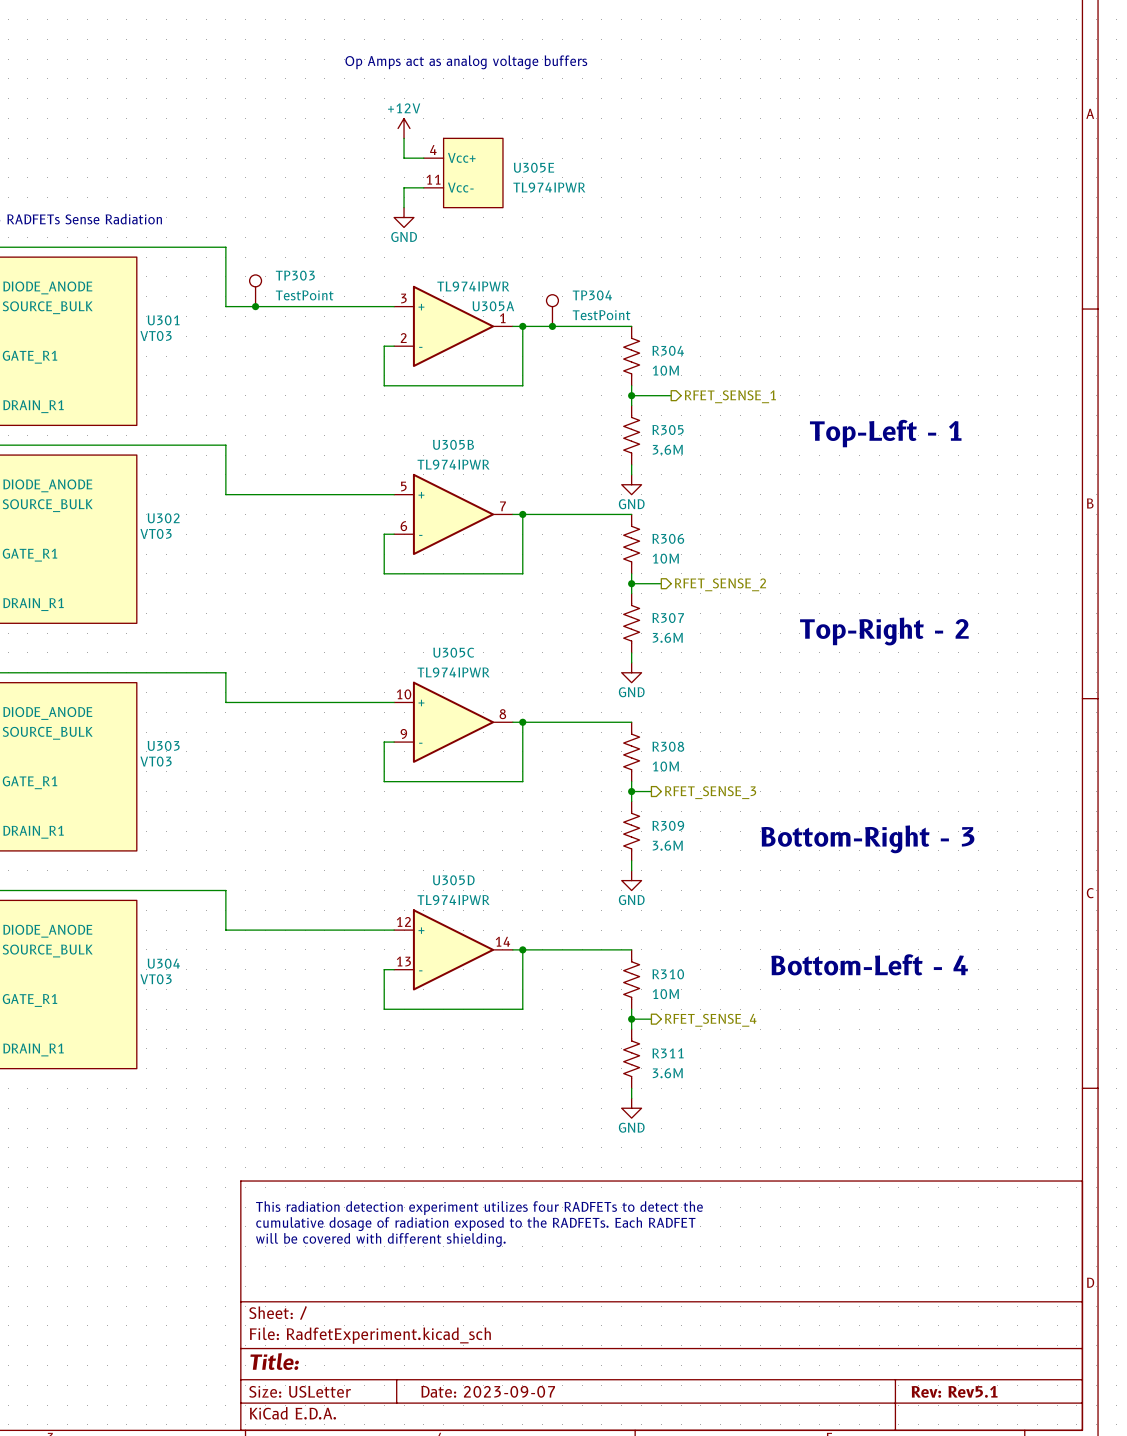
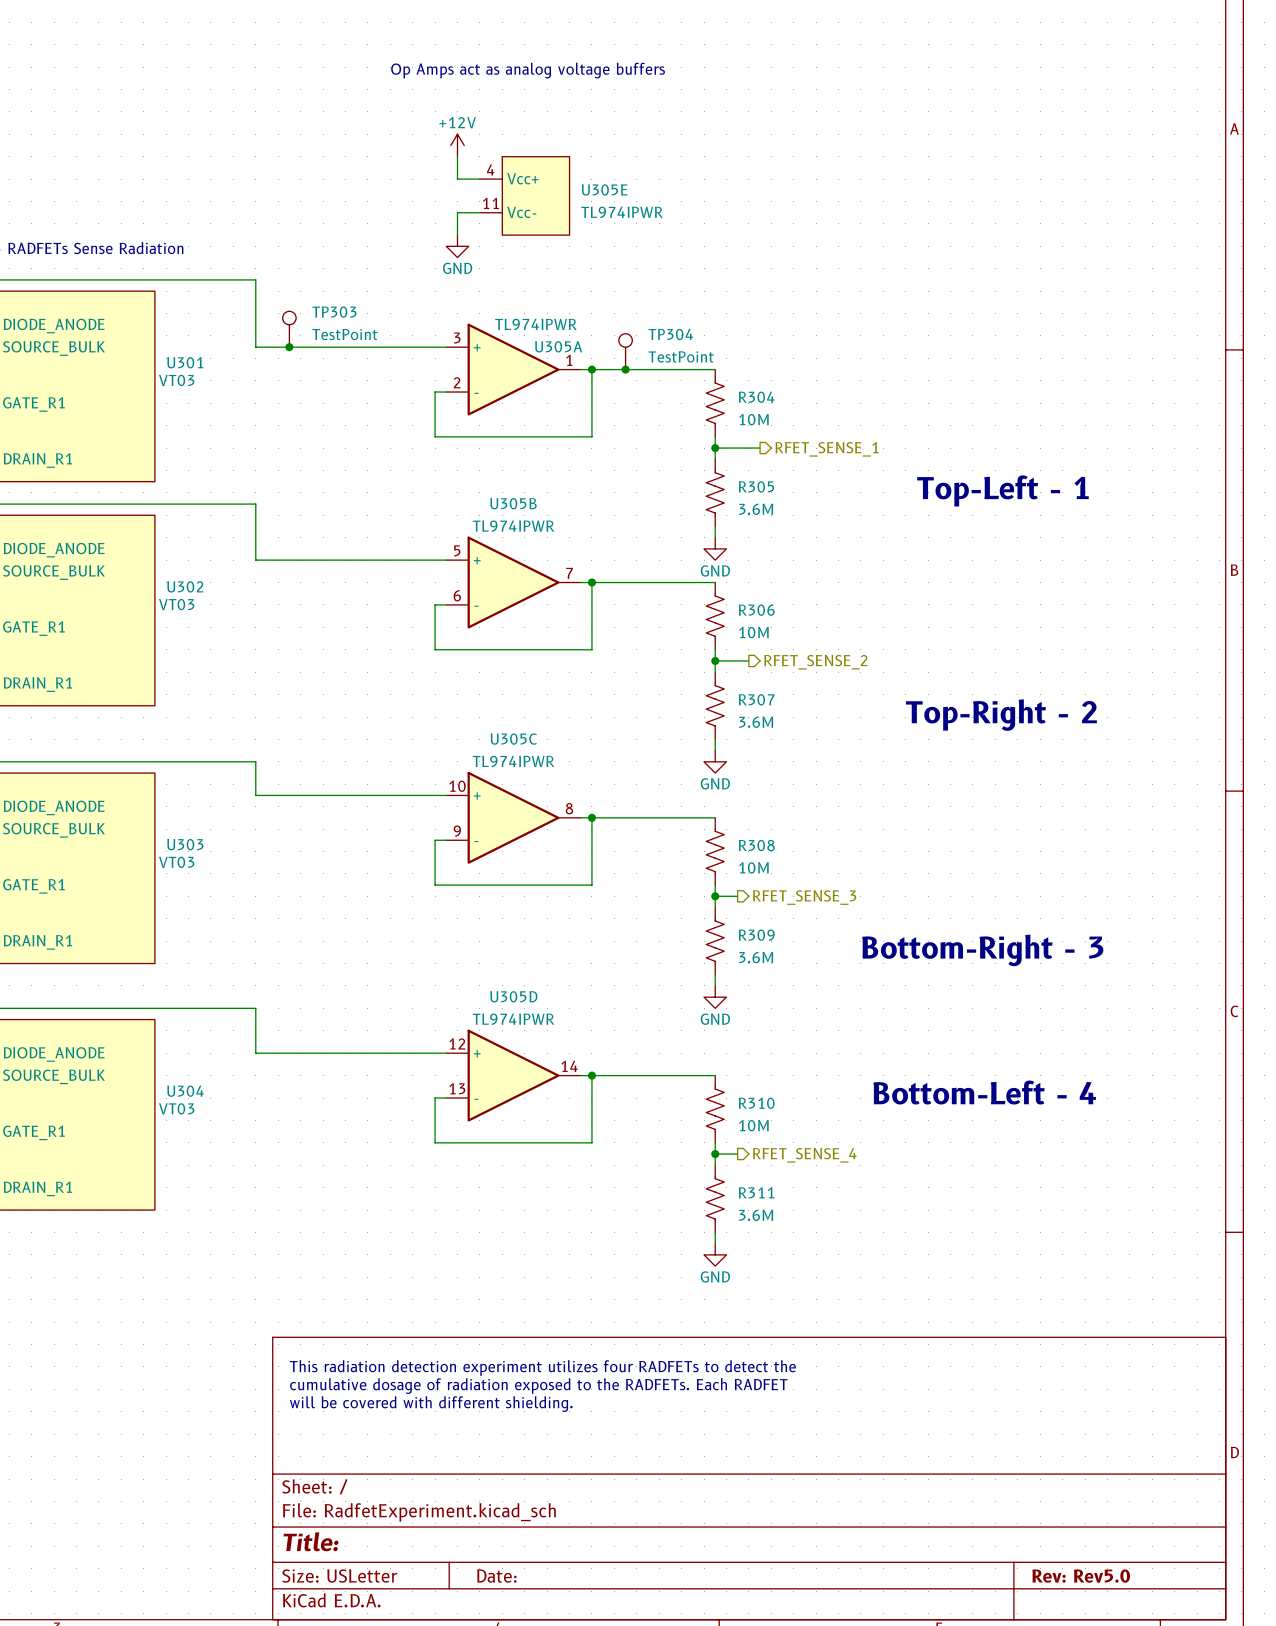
title block: Date: 2023-09-07 (488, 1391) -> Date: (496, 1576)
title block: Rev: Rev5.1 (954, 1391) -> Rev: Rev5.0 (1081, 1576)

